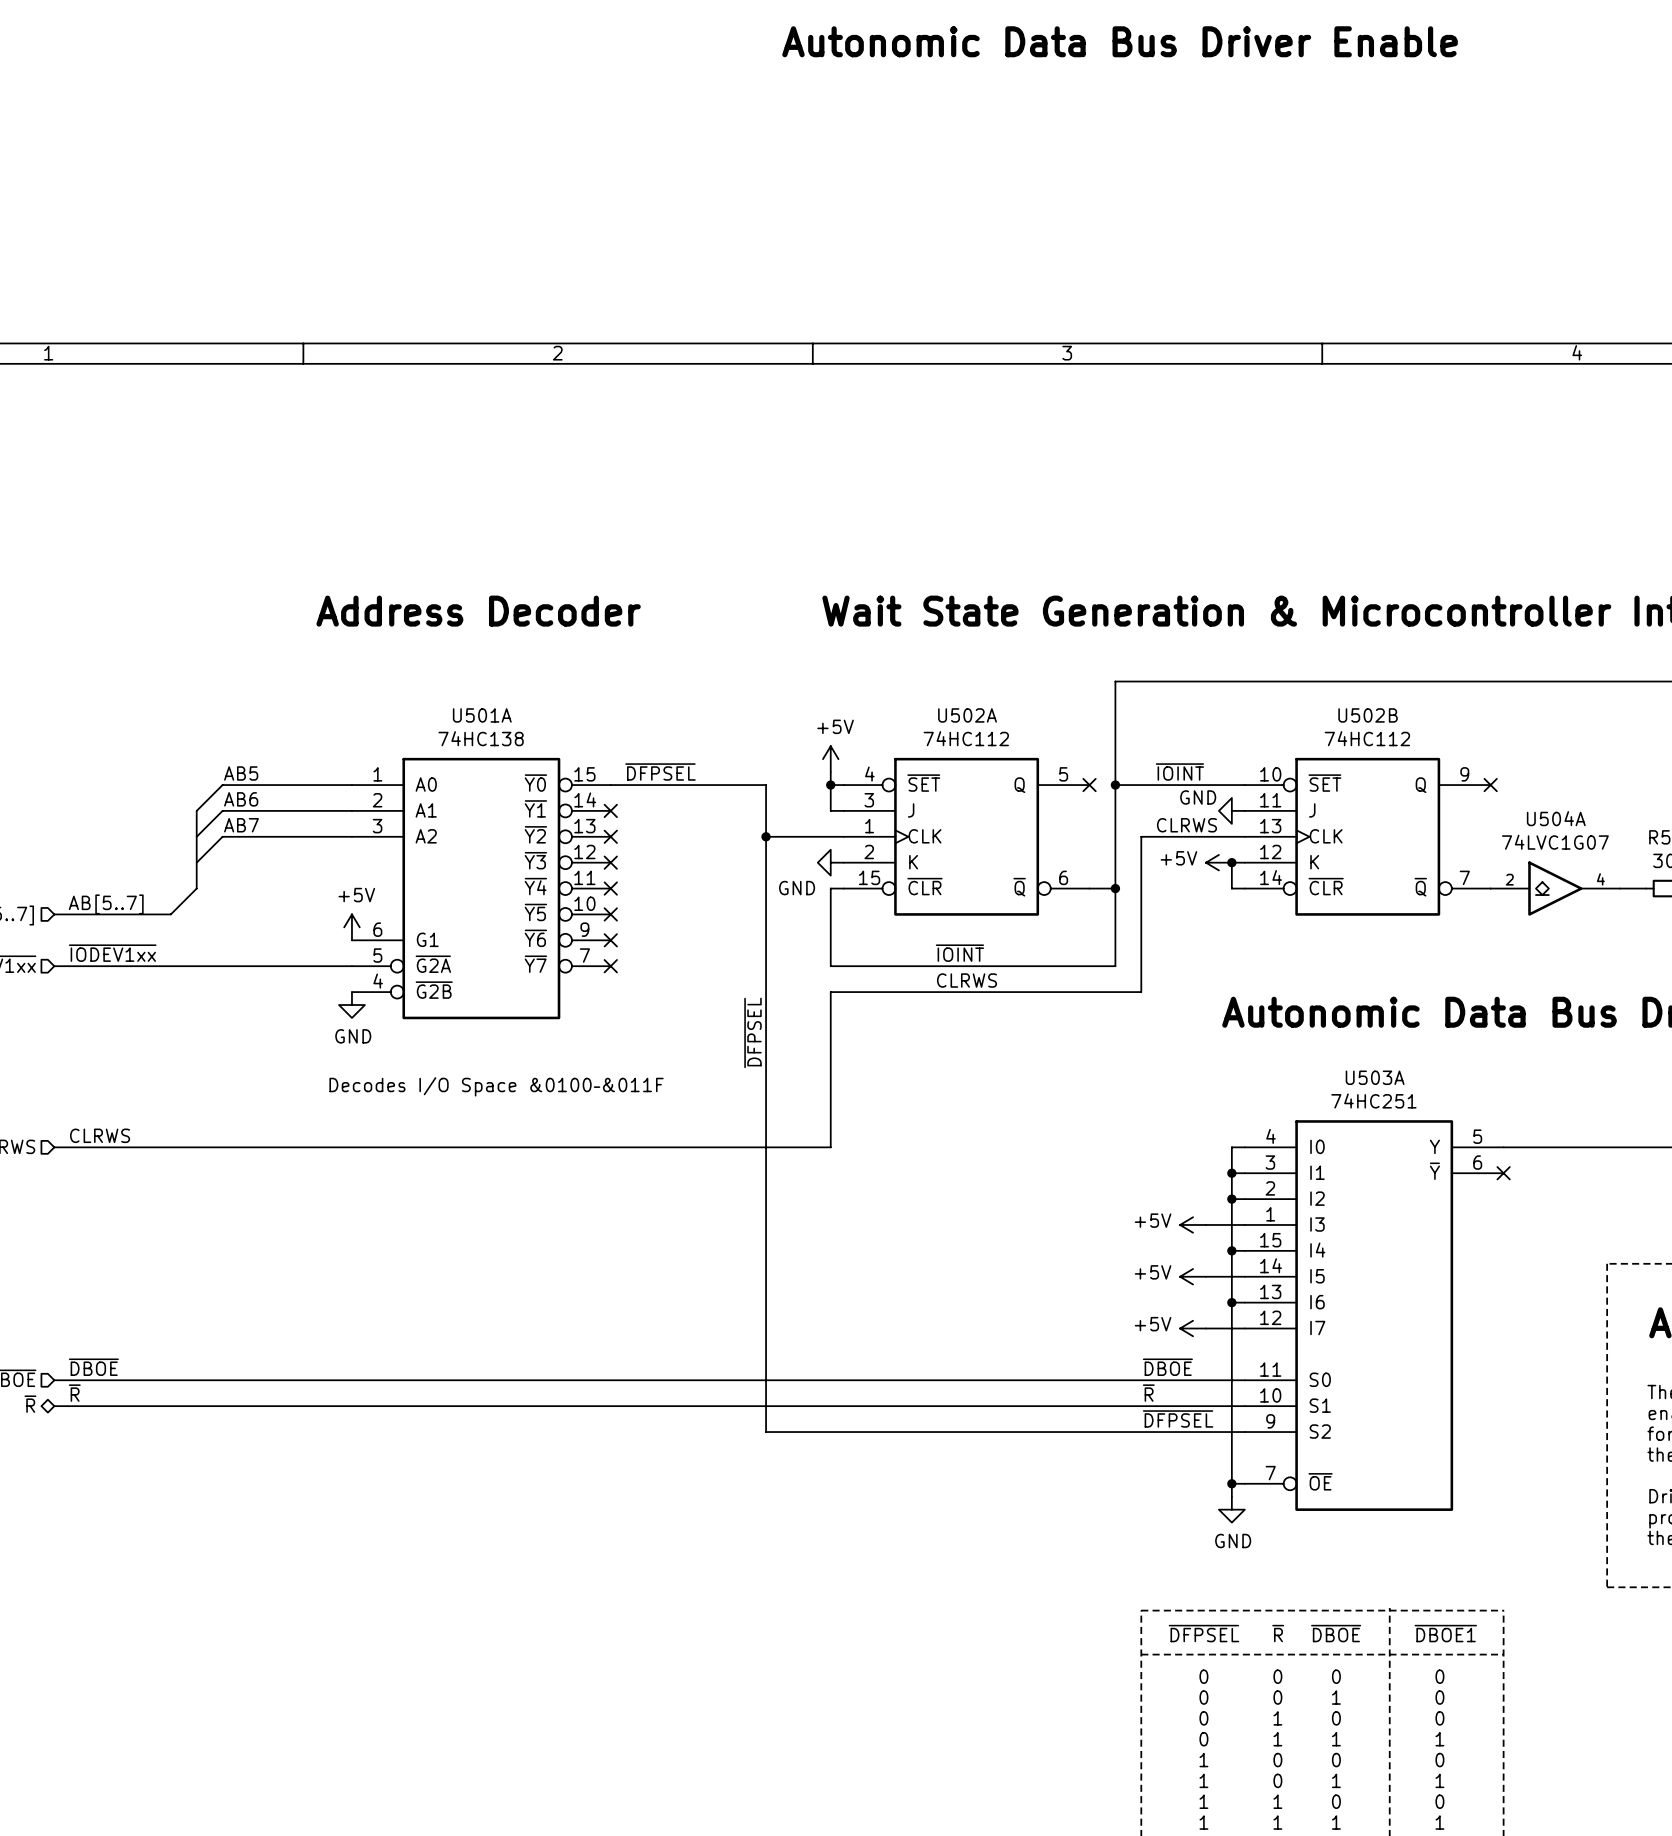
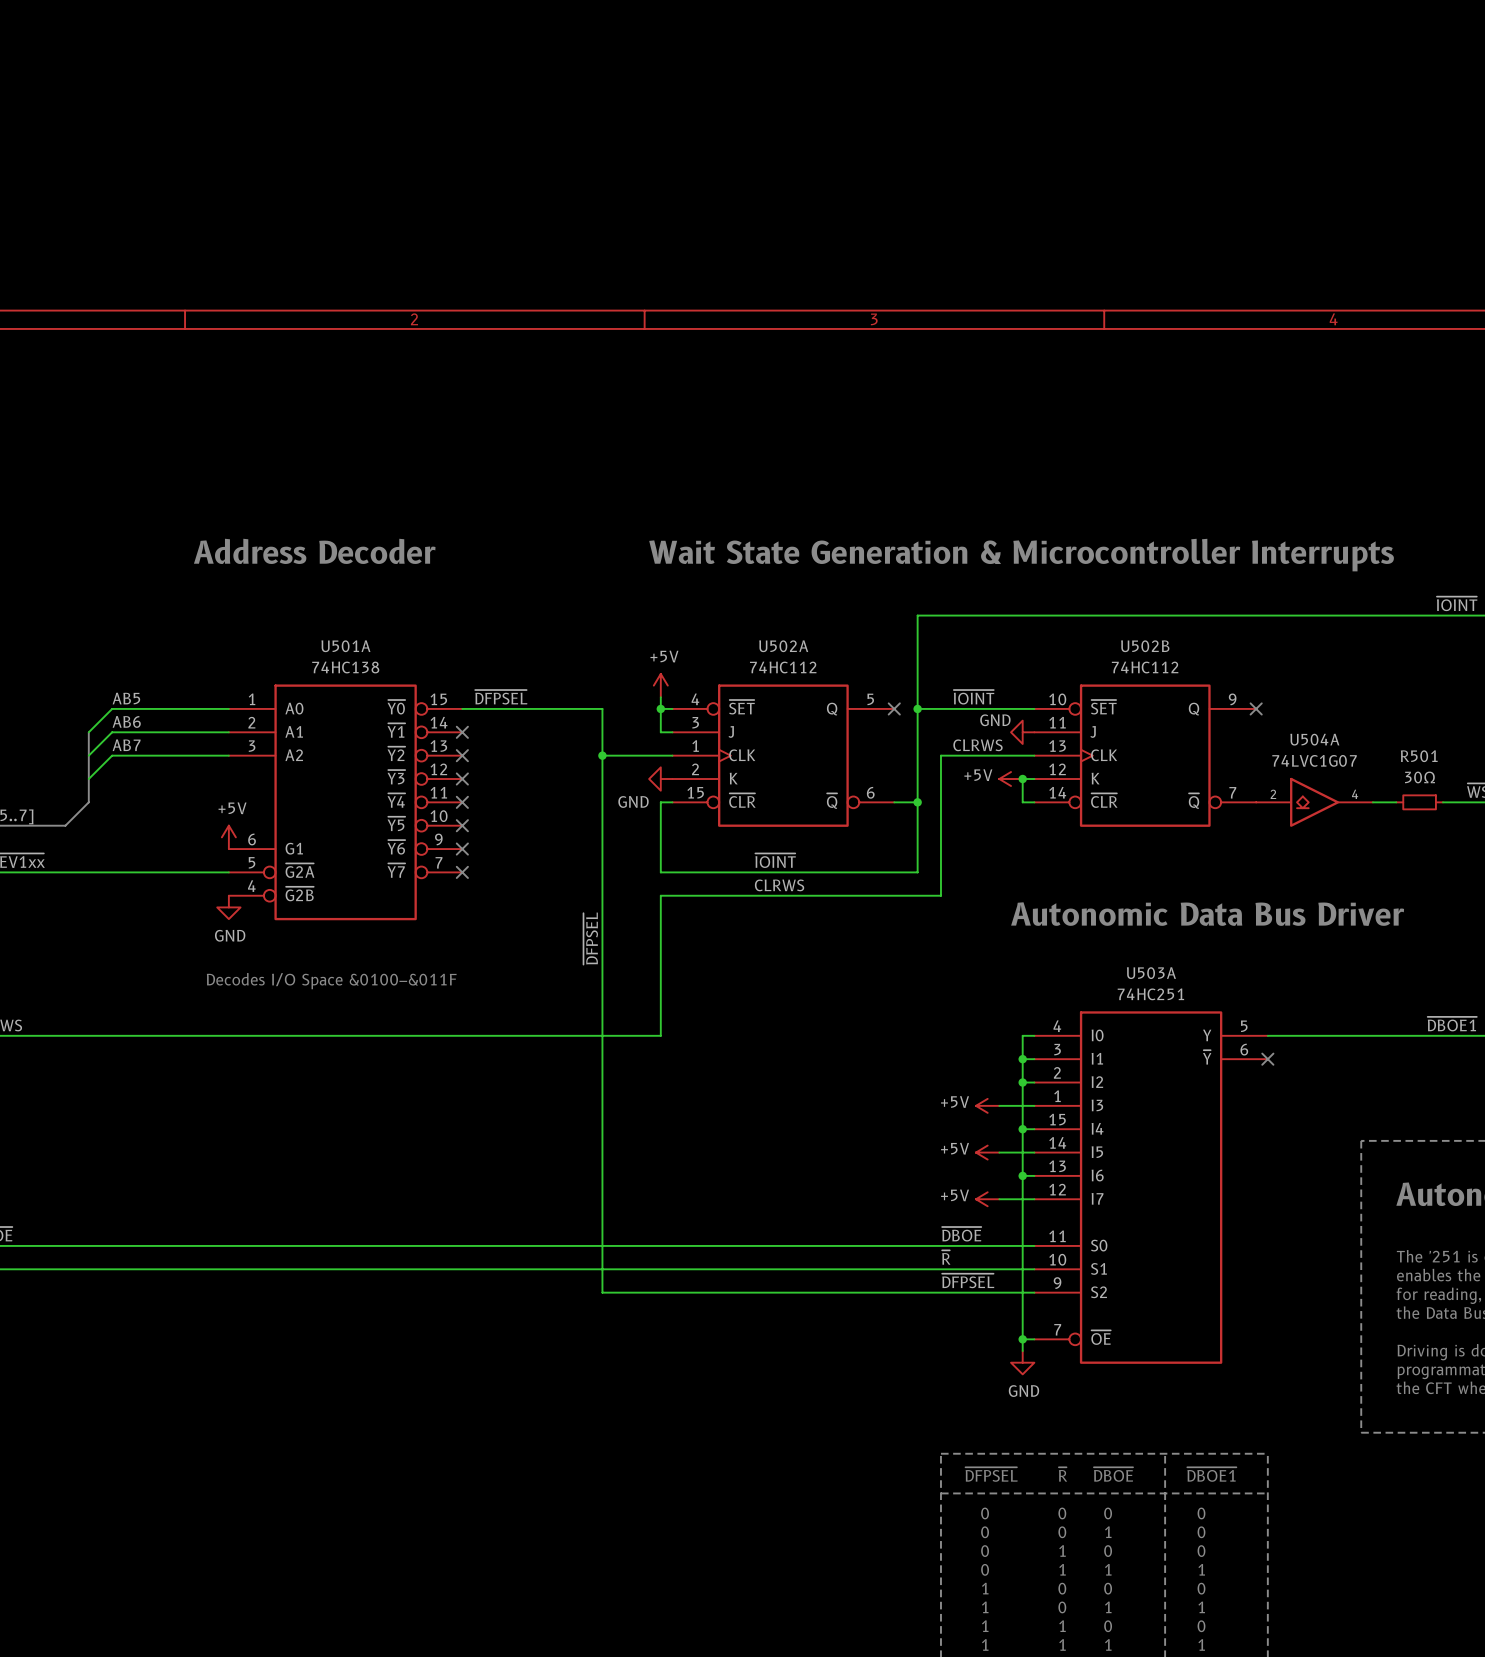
text: Autonomic Data Bus Driver Enable (1120, 41) -> none

